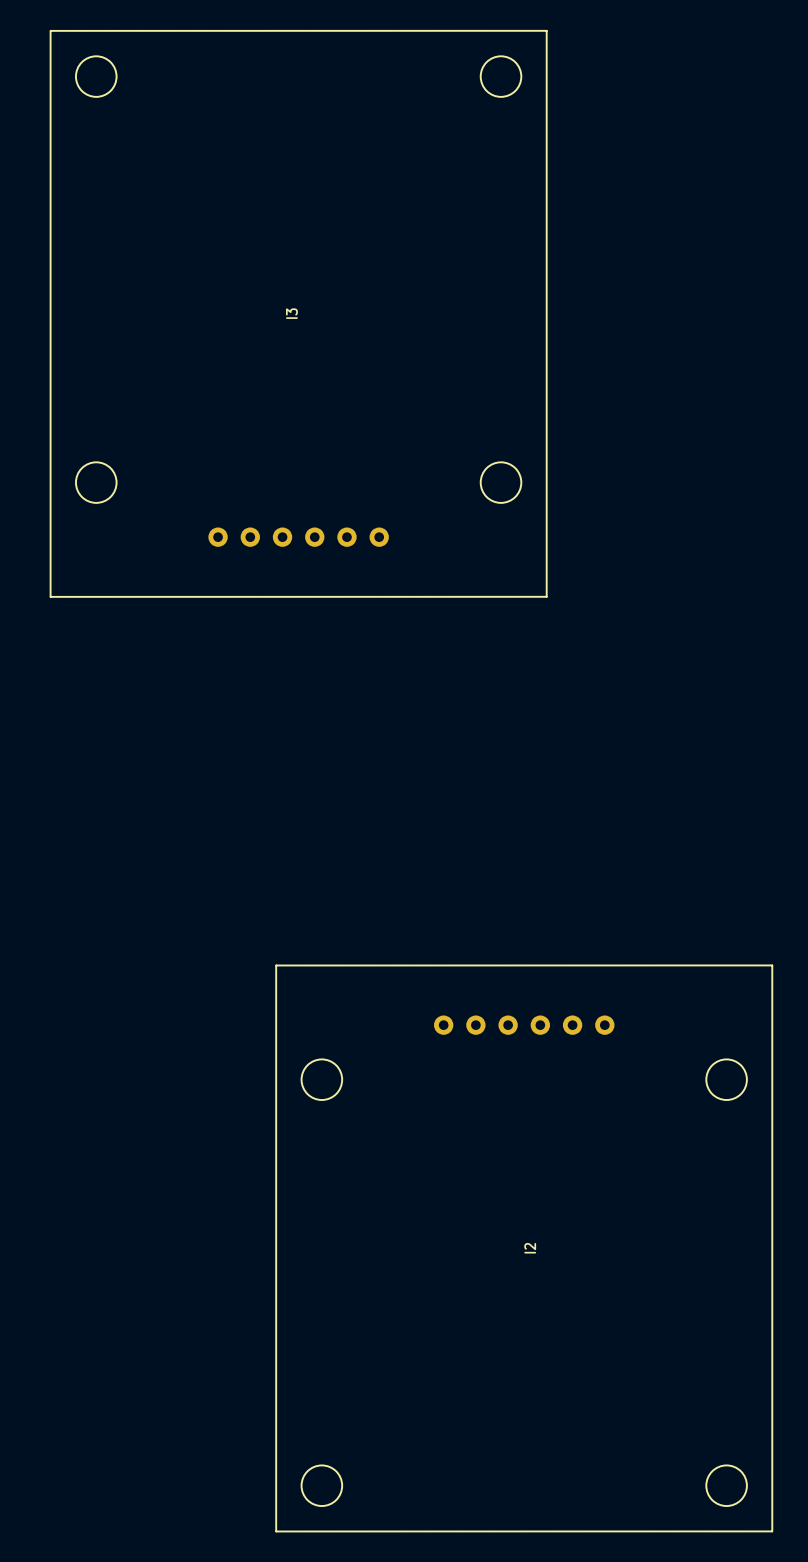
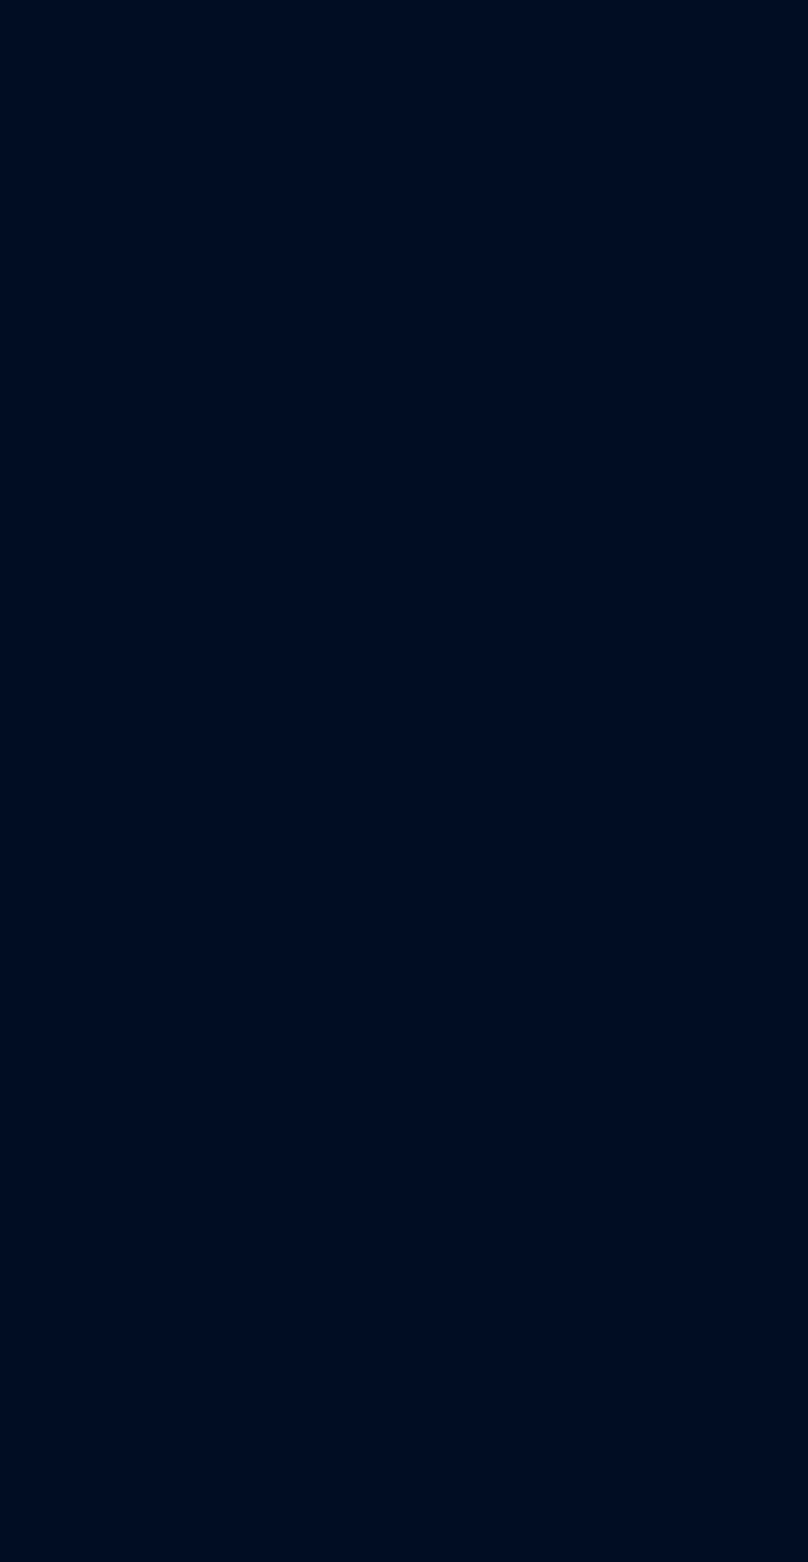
I3: (298, 313) -> none
I2: (524, 1248) -> none

